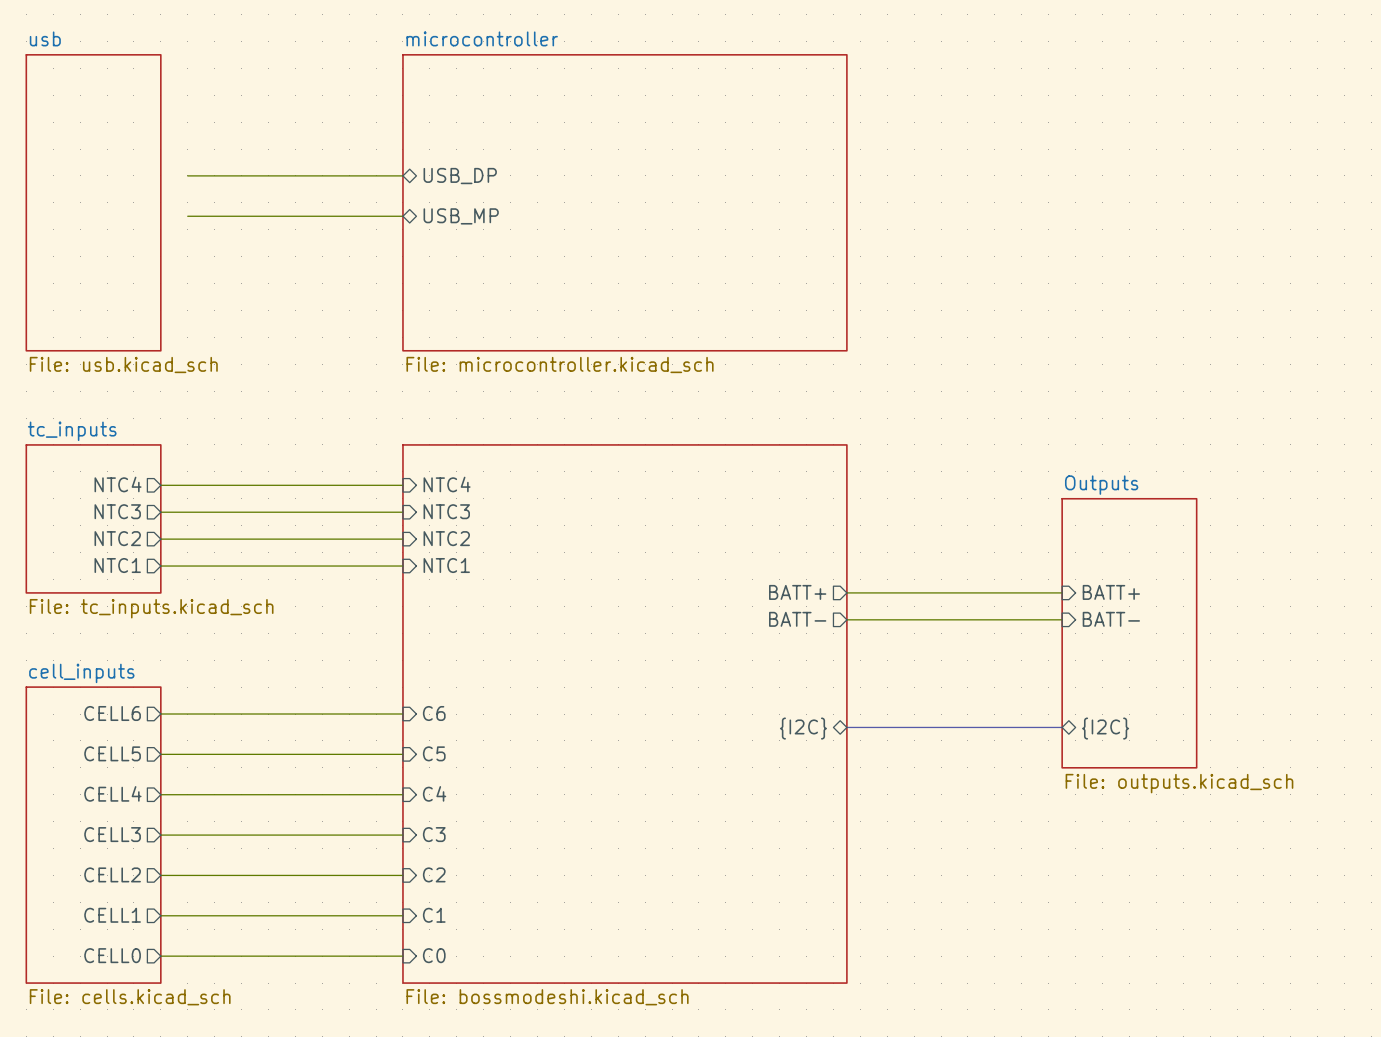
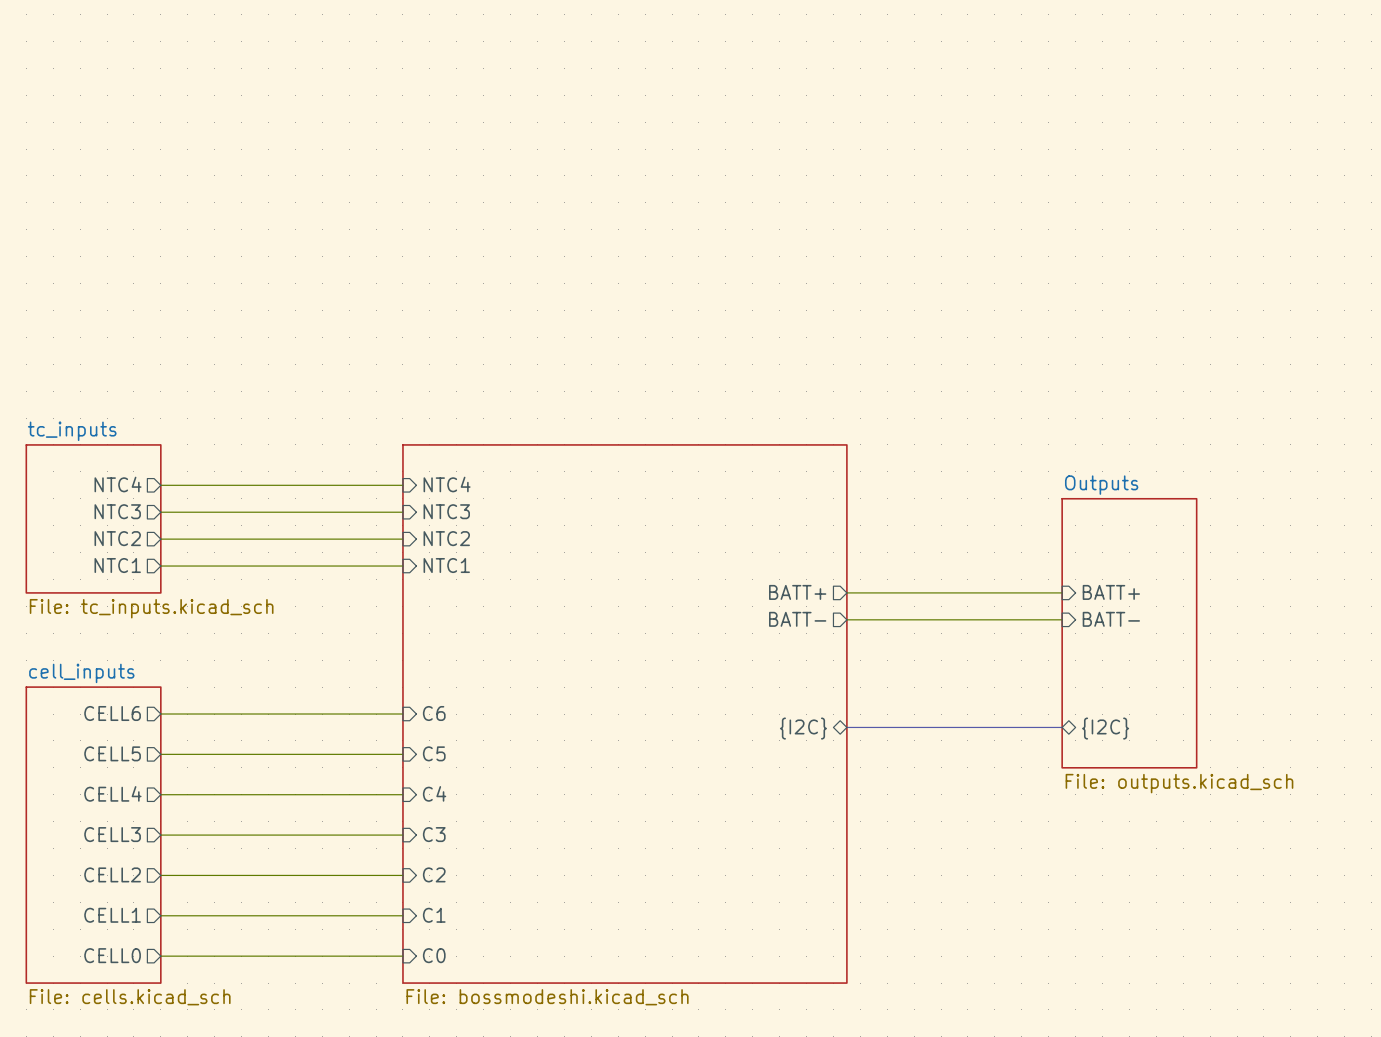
wire: (187, 175) (402, 175) -> none
sheet pin: USB_DP (460, 176) -> none
sheet usb: File: usb.kicad_sch (93, 202) -> none
sheet microcontroller: File: microcontroller.kicad_sch (624, 202) -> none
wire: (187, 216) (402, 216) -> none
sheet pin: USB_MP (461, 216) -> none

